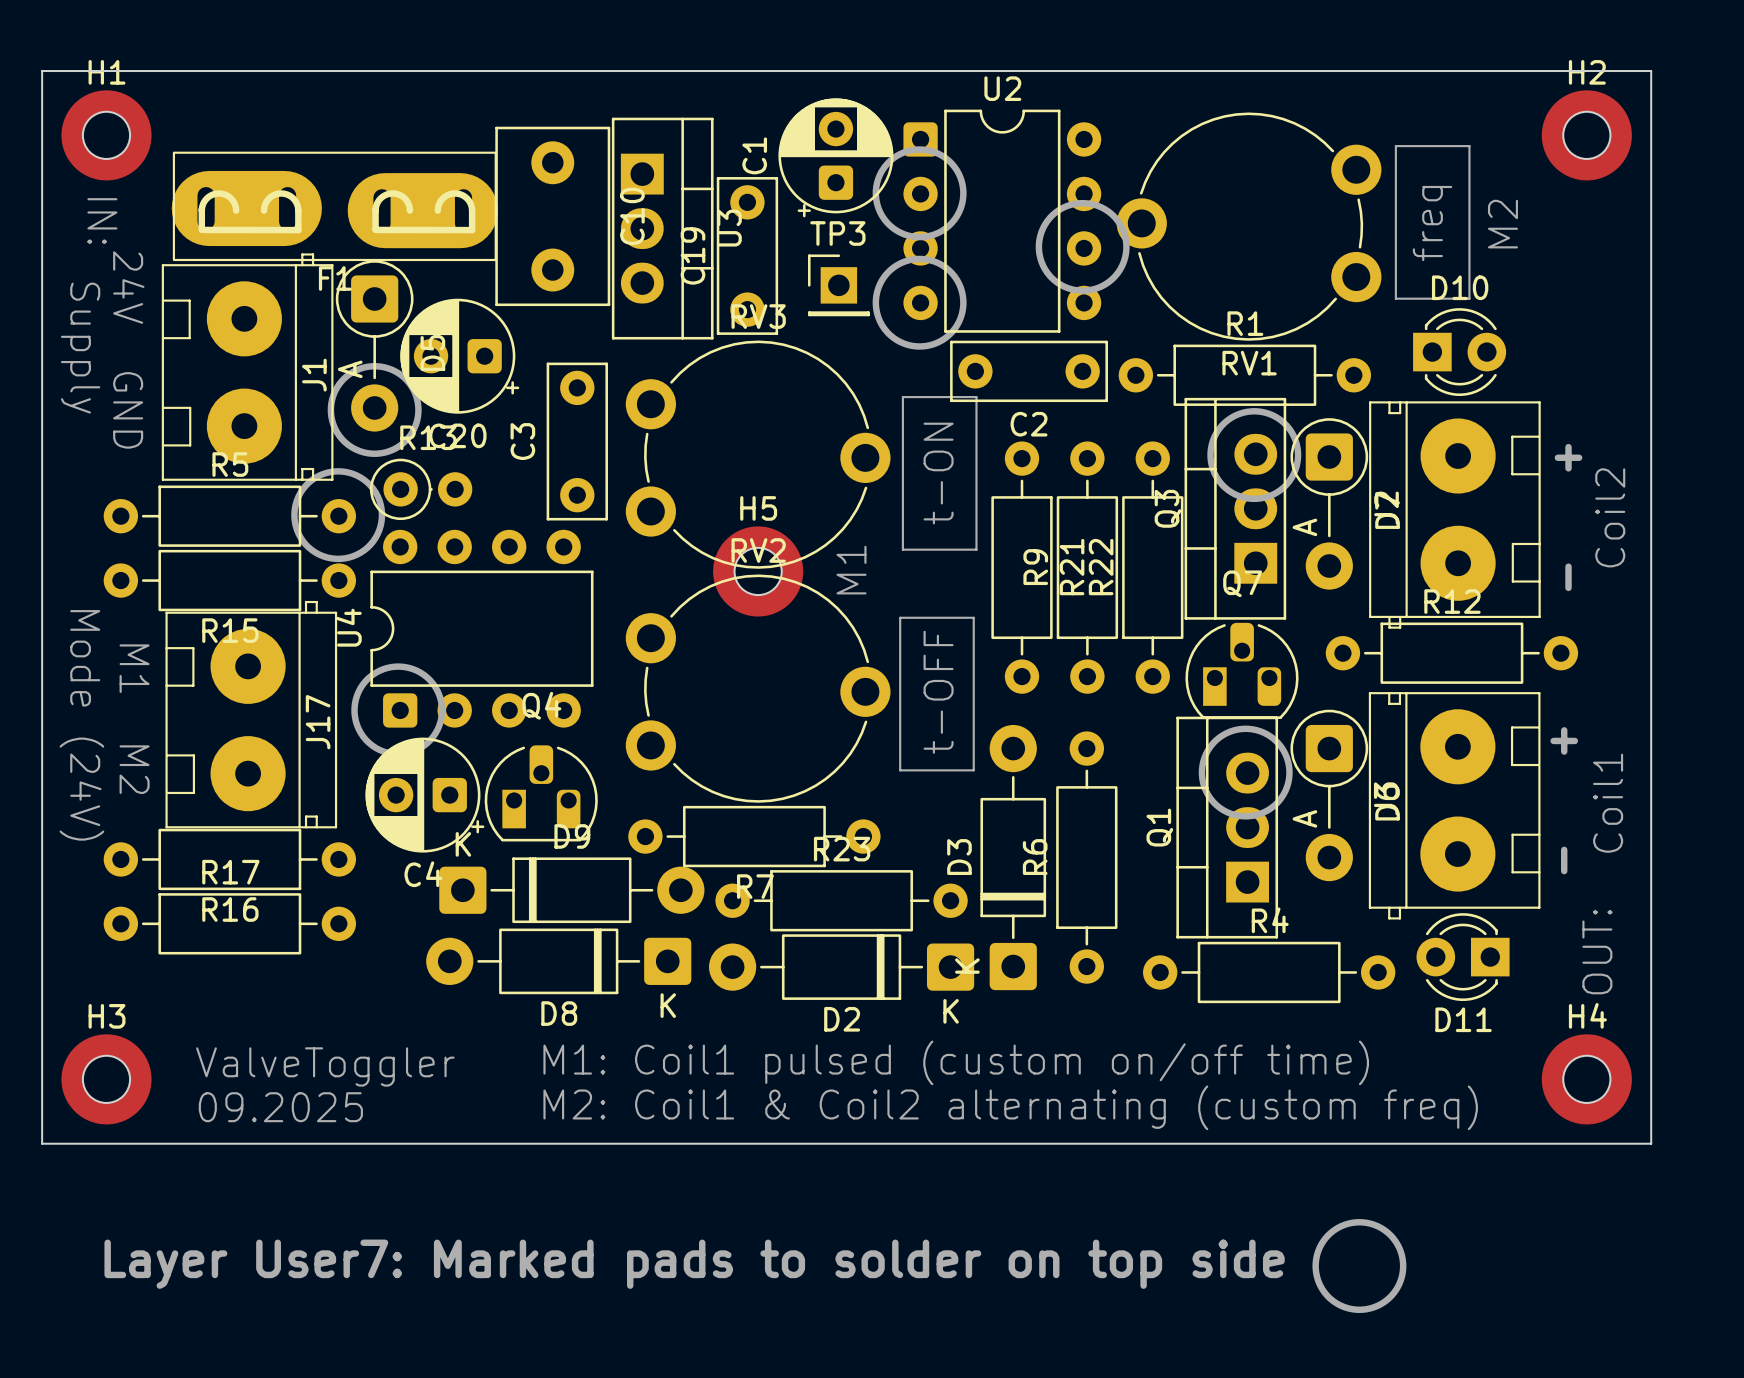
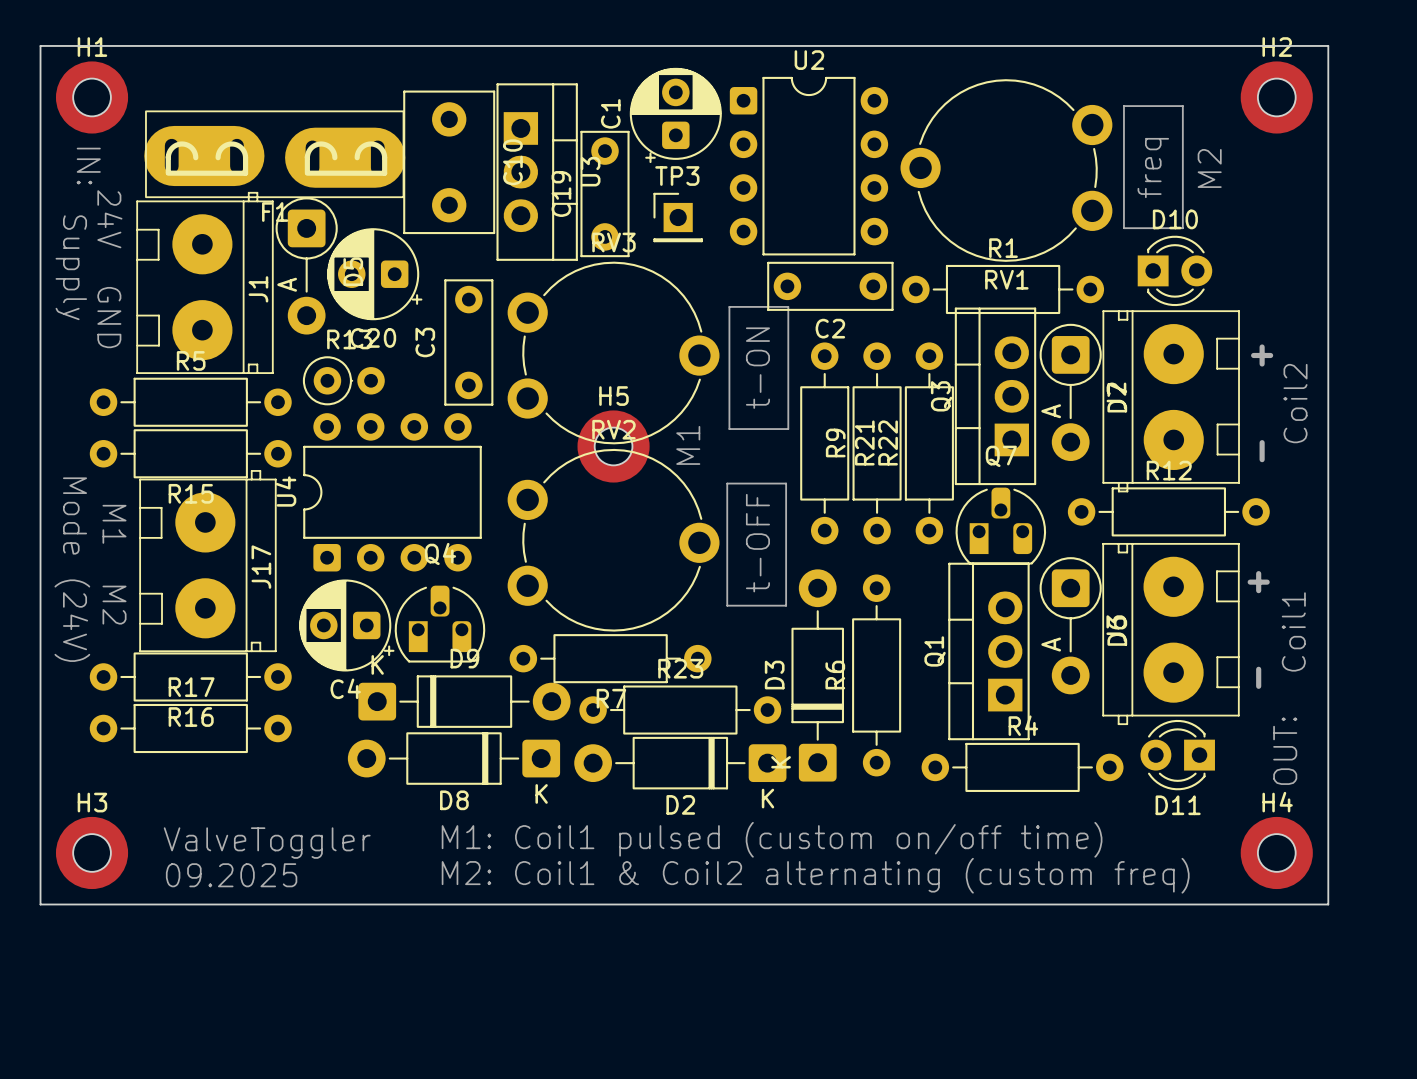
drawing: [872, 146, 967, 350] -> none
drawing: [1035, 199, 1130, 294] -> none
drawing: [291, 363, 422, 563] -> none
drawing: [1207, 408, 1302, 503] -> none
drawing: [351, 663, 446, 758] -> none
drawing: [1198, 725, 1293, 820] -> none
drawing: [1312, 1219, 1407, 1313] -> none
text: Layer User7: Marked pads to solder on top side (694, 1264) -> none

